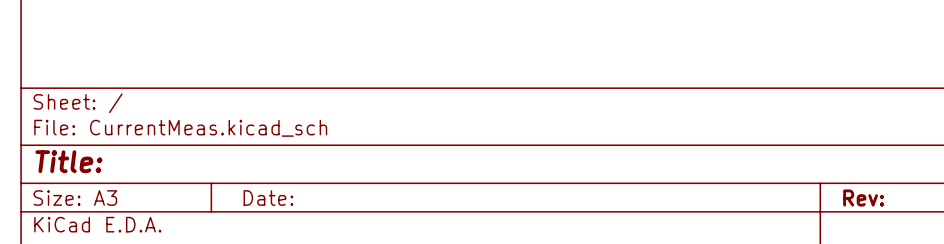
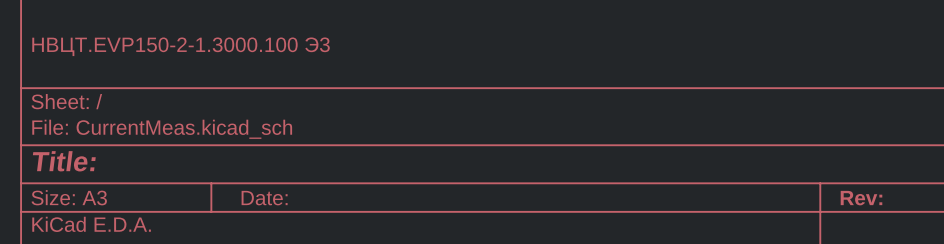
title block: none -> НВЦТ.EVP150-2-1.3000.100 Э3 (181, 46)

